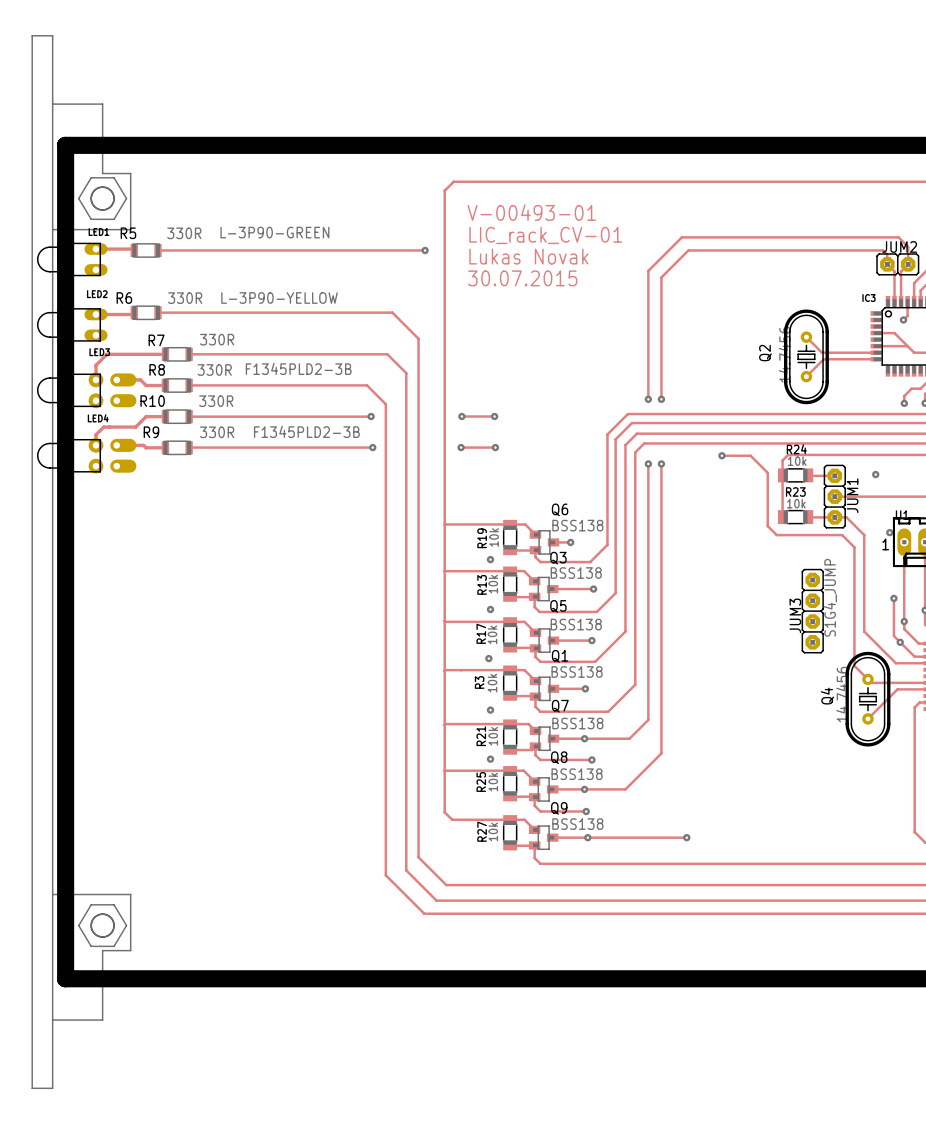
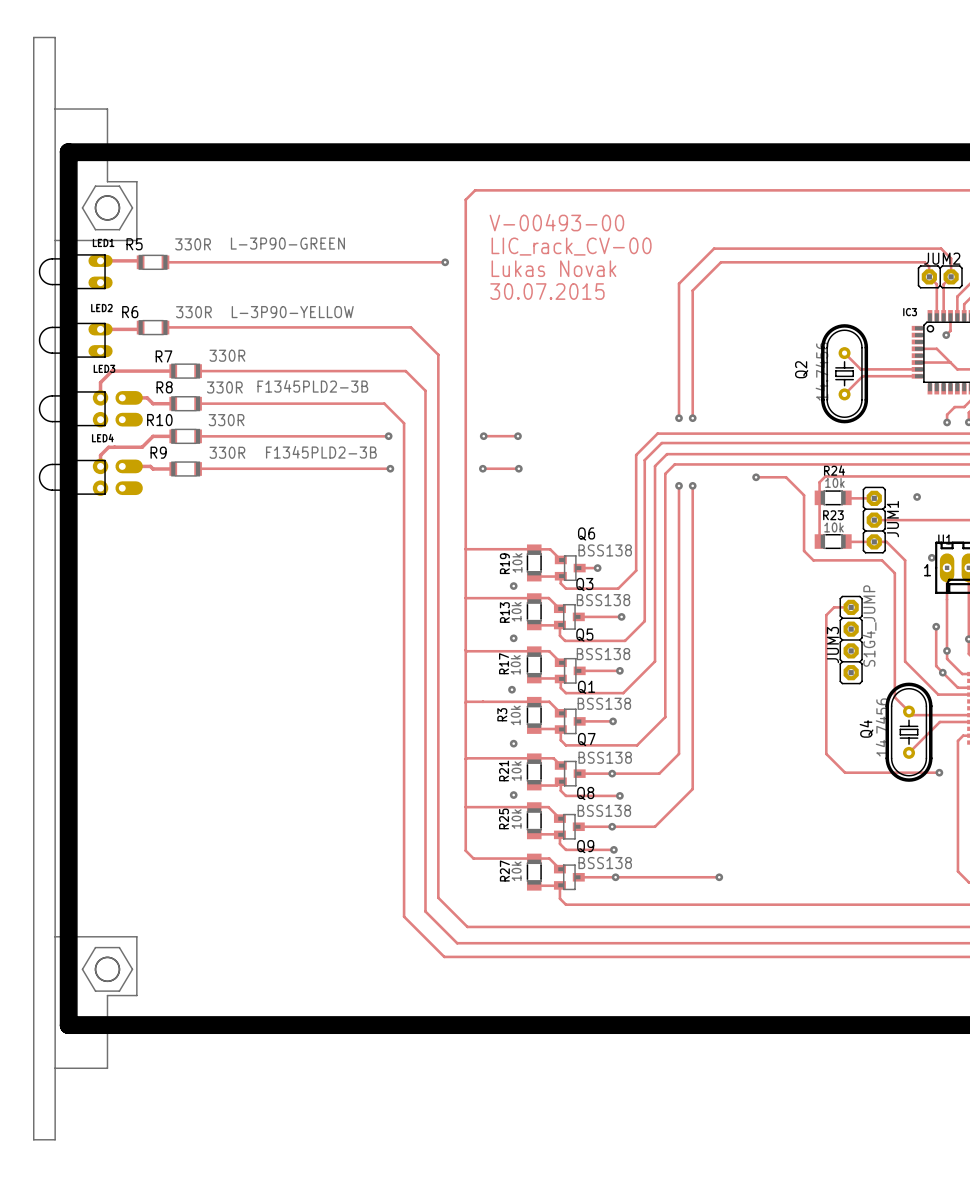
text: V-00493-01 (531, 212) -> V-00493-00 (556, 222)
text: LIC_rack_CV-01 (545, 235) -> LIC_rack_CV-00 (571, 246)
track: none -> (851, 607) (834, 607) (826, 615) (826, 753) (845, 772) (939, 772)
via: none -> (939, 772)

